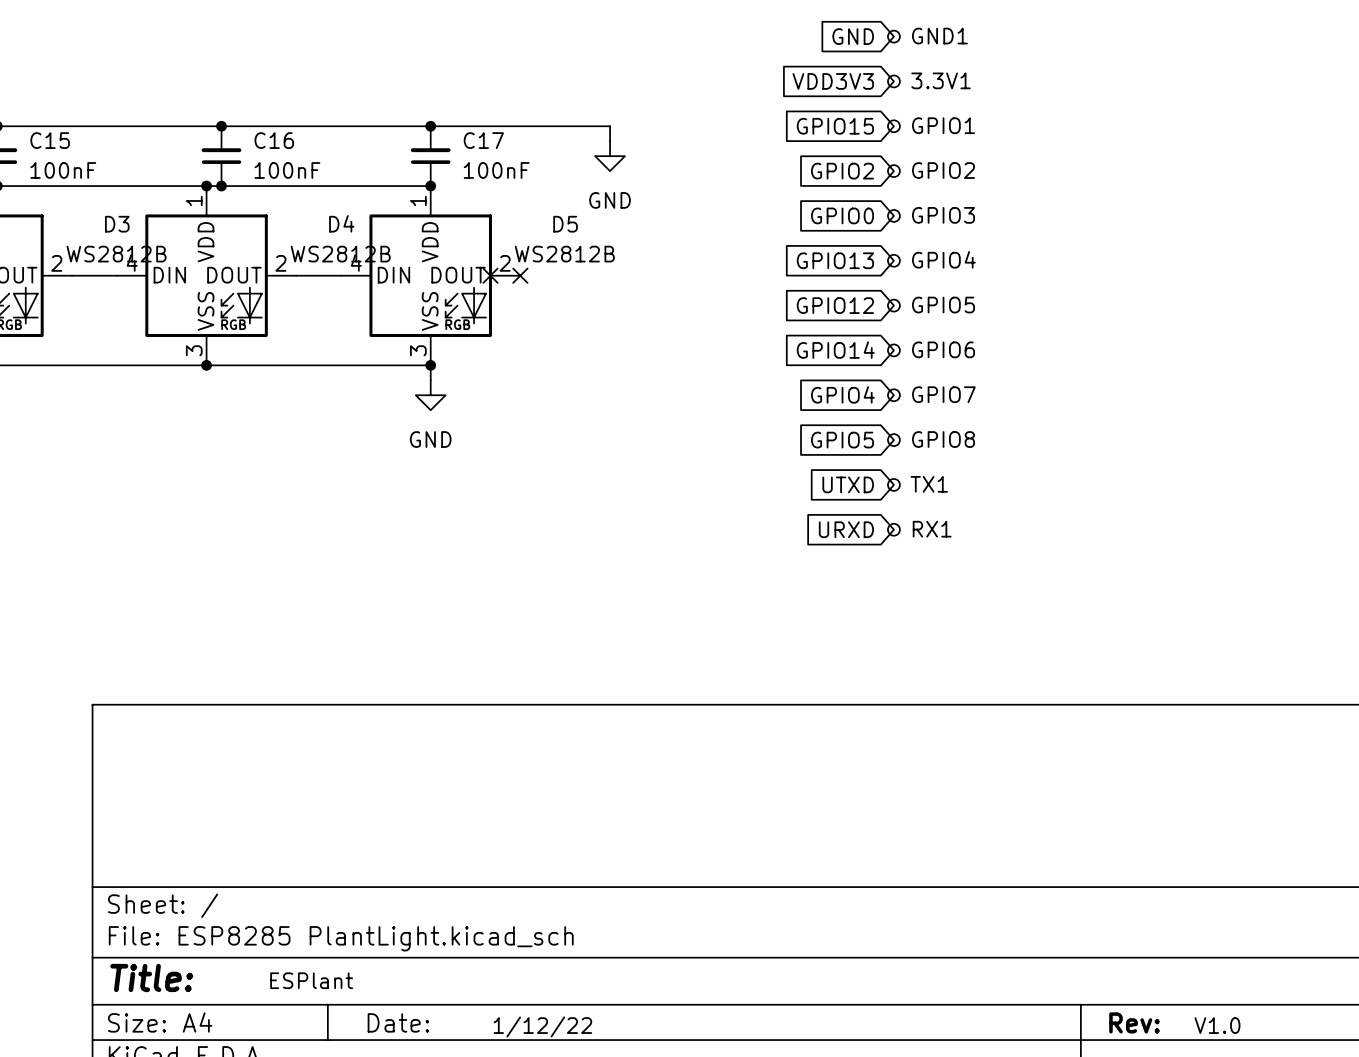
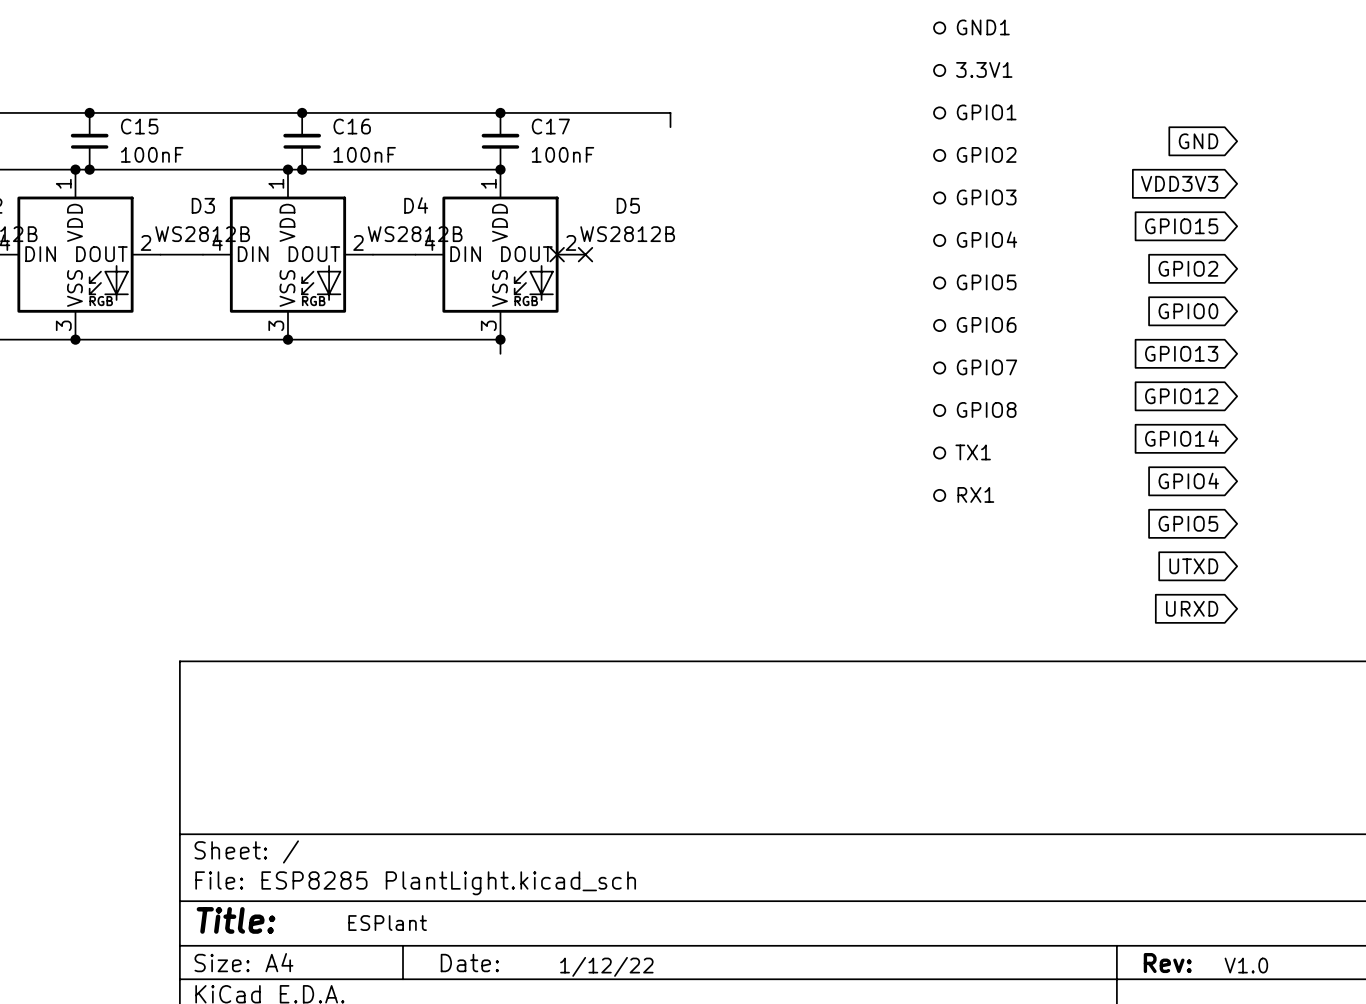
global label: GND (853, 36) -> none
global label: VDD3V3 (833, 81) -> none
global label: GPIO15 (835, 126) -> none
power symbol: GND (610, 156) -> none
global label: none -> GND (1198, 141)
global label: GPIO2 (842, 171) -> none
global label: none -> VDD3V3 (1179, 183)
global label: GPIO0 (842, 215) -> none
global label: none -> GPIO15 (1181, 226)
global label: GPIO13 (835, 260) -> none
global label: none -> GPIO2 (1188, 268)
global label: GPIO12 (835, 305) -> none
global label: none -> GPIO0 (1188, 311)
global label: GPIO14 (835, 350) -> none
global label: none -> GPIO13 (1181, 353)
global label: GPIO4 (842, 394) -> none
power symbol: GND (430, 395) -> none
global label: none -> GPIO12 (1181, 396)
global label: GPIO5 (842, 440) -> none
global label: none -> GPIO14 (1181, 438)
global label: UTXD (848, 484) -> none
global label: none -> GPIO4 (1188, 480)
global label: URXD (846, 529) -> none
global label: none -> GPIO5 (1188, 523)
global label: none -> UTXD (1193, 566)
global label: none -> URXD (1192, 608)

